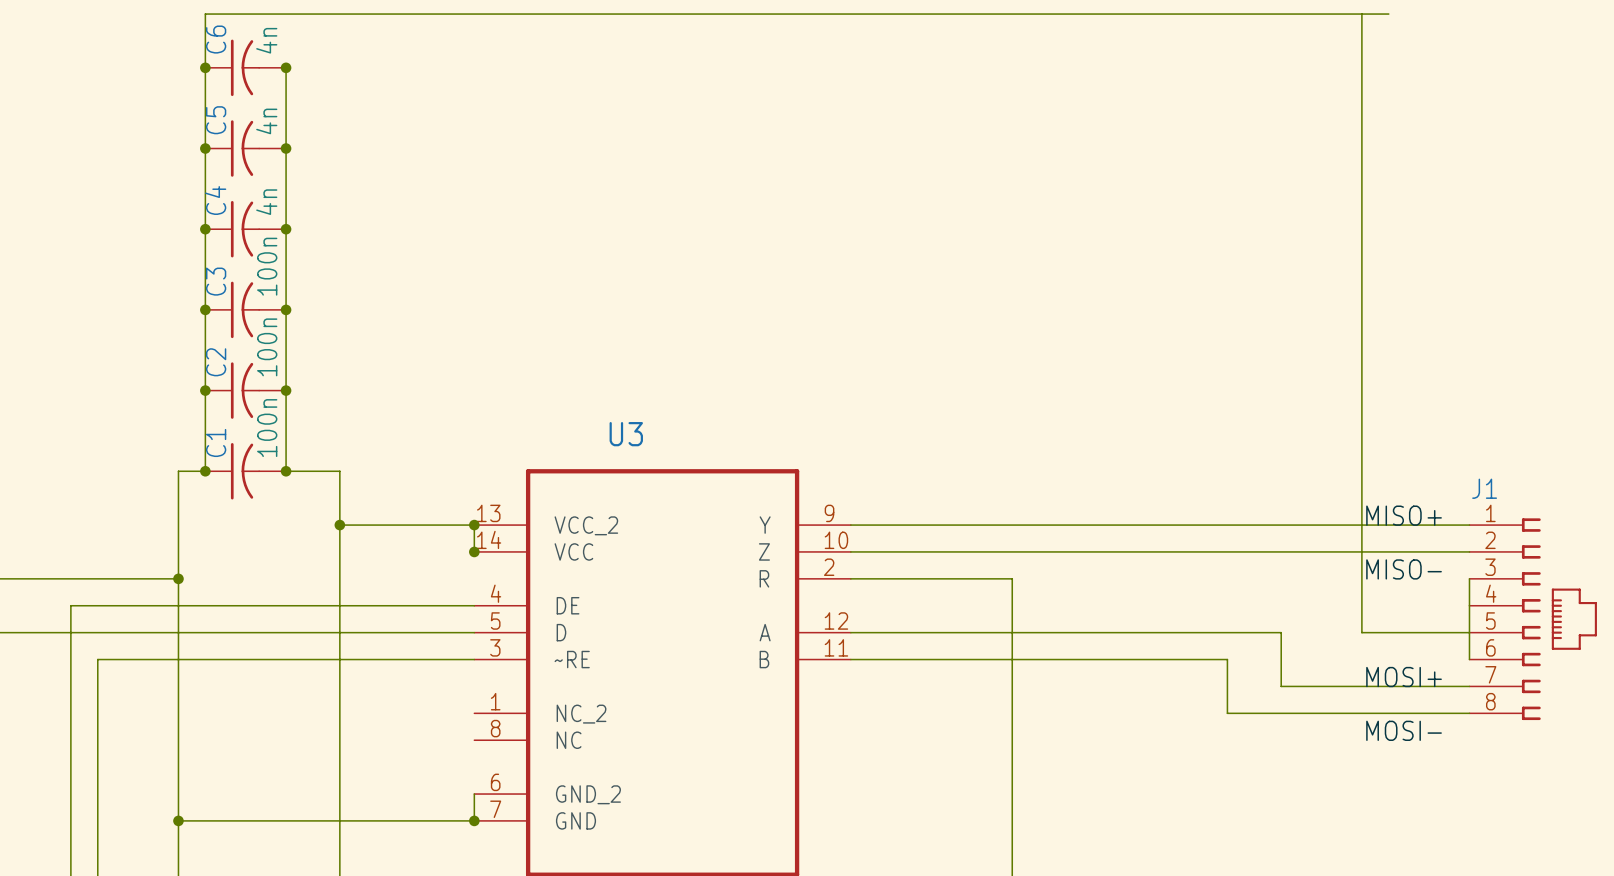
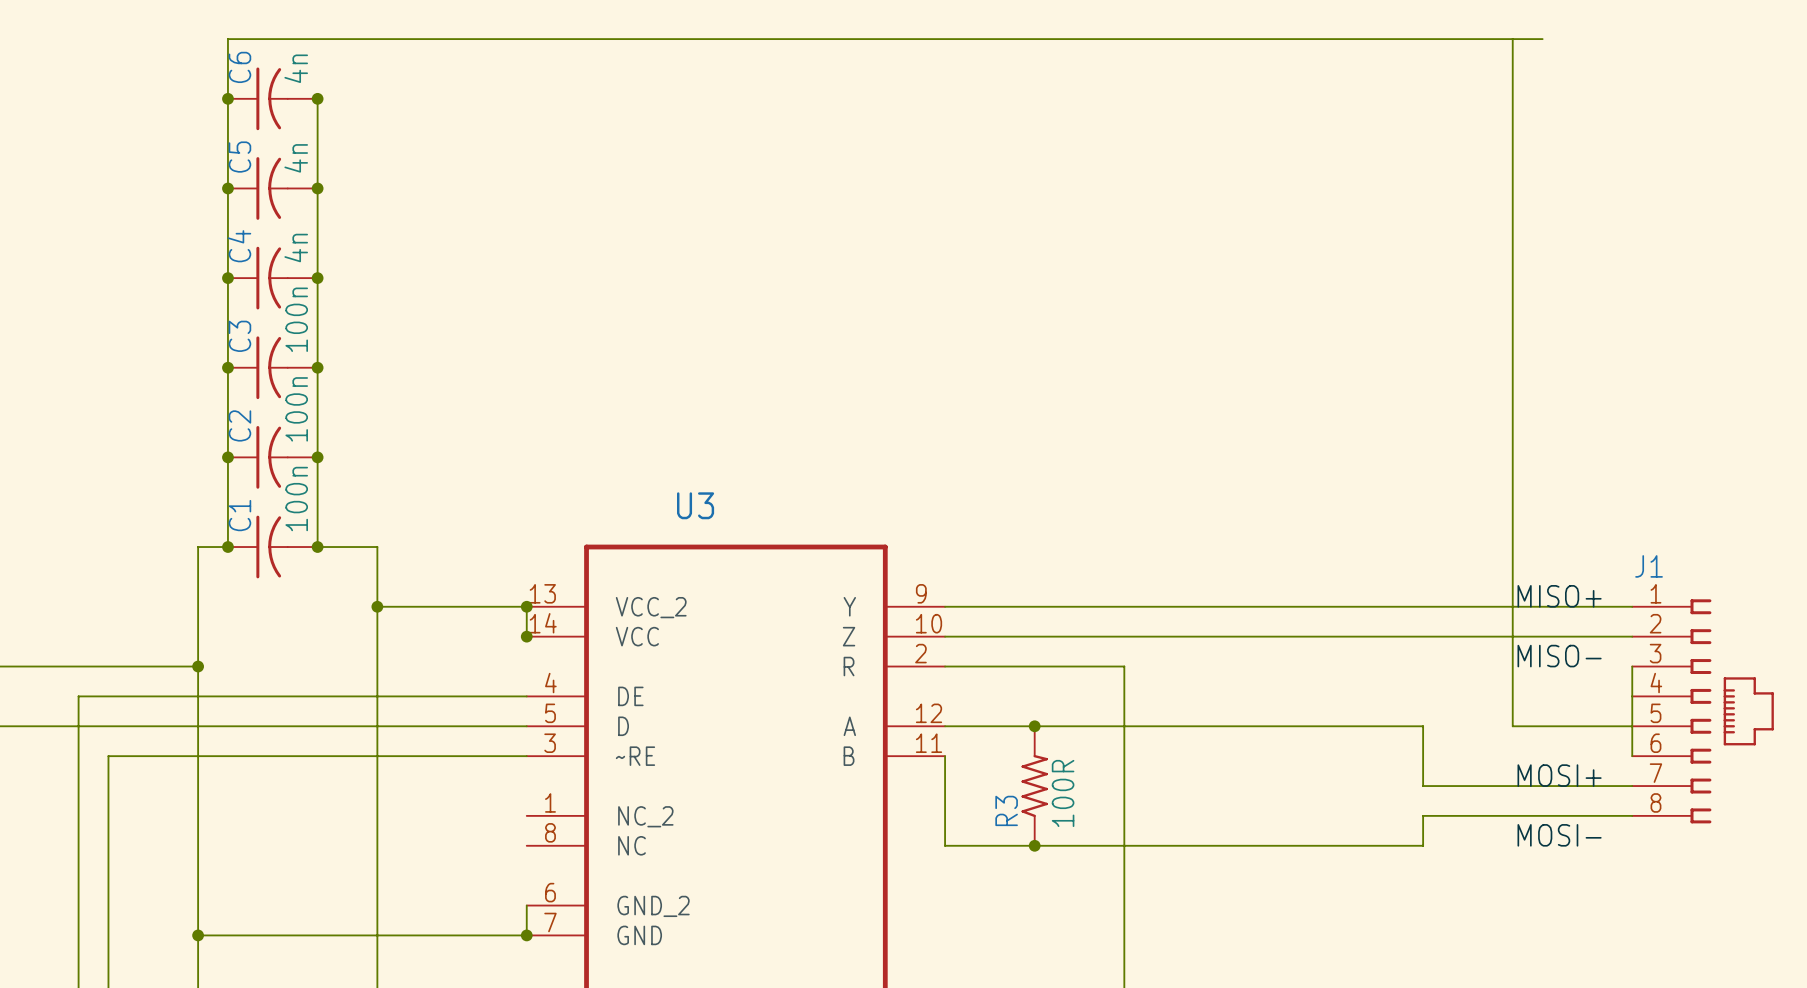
junction: none -> (1034, 726)
wire: (850, 659) (1227, 659) (1227, 713) (1281, 713) -> (945, 756) (945, 845) (1423, 845) (1423, 815)
R3: none -> 100R (1034, 786)
junction: none -> (1034, 845)

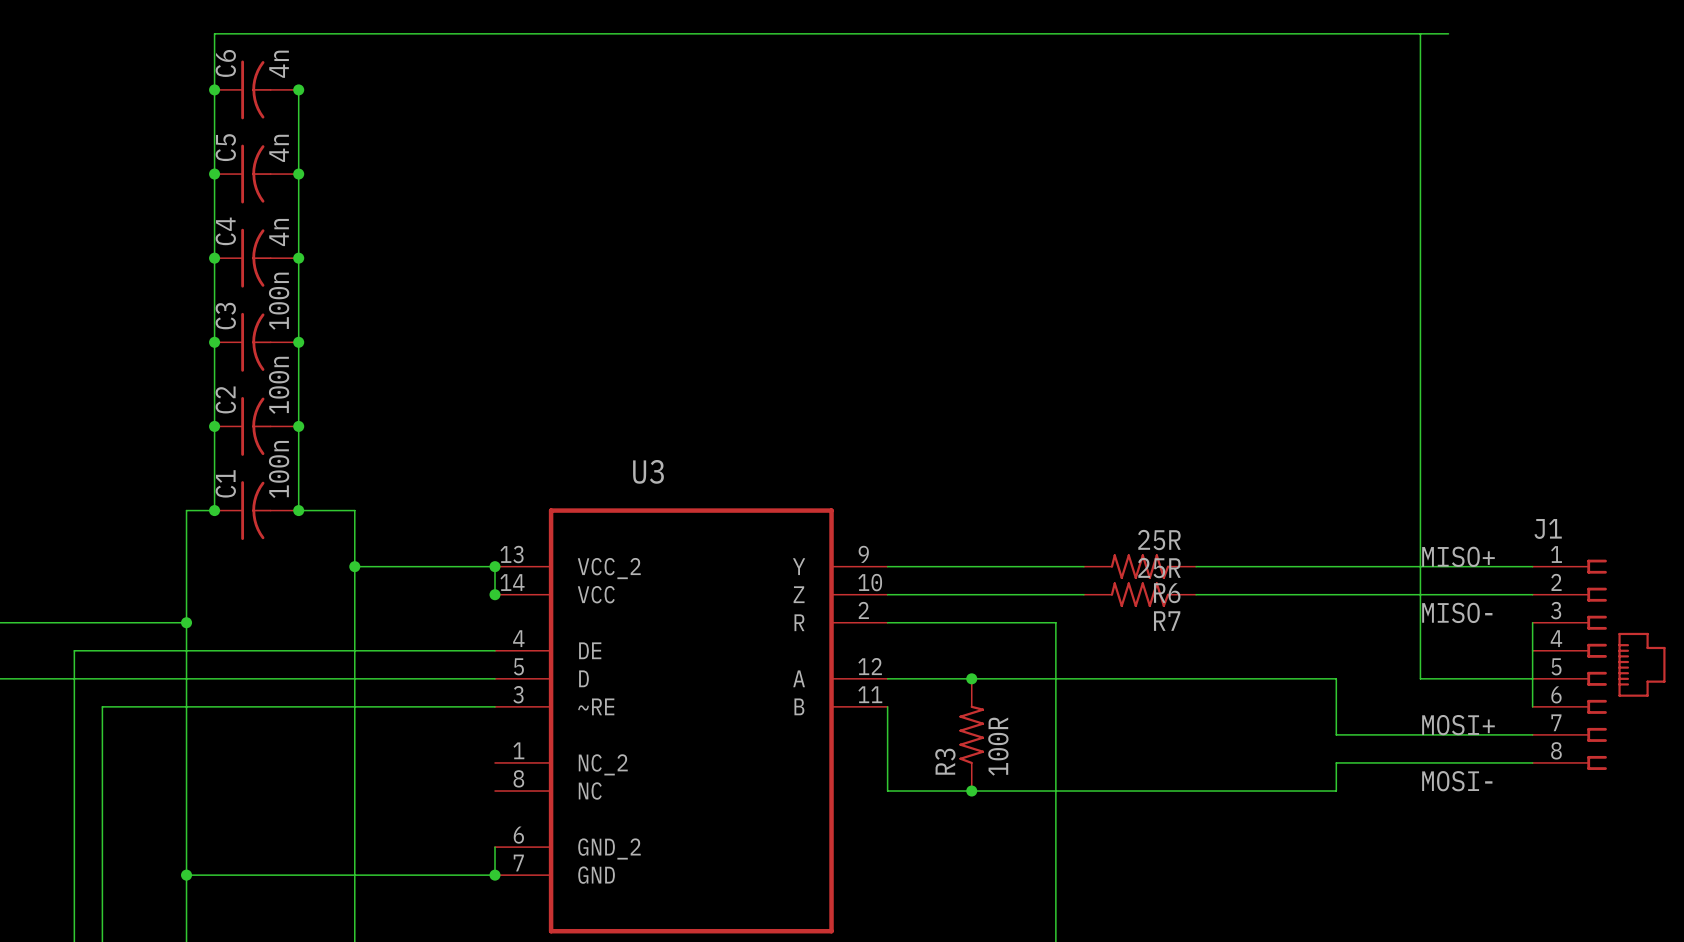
R6: none -> 25R (1140, 566)
R7: none -> 25R (1140, 594)

